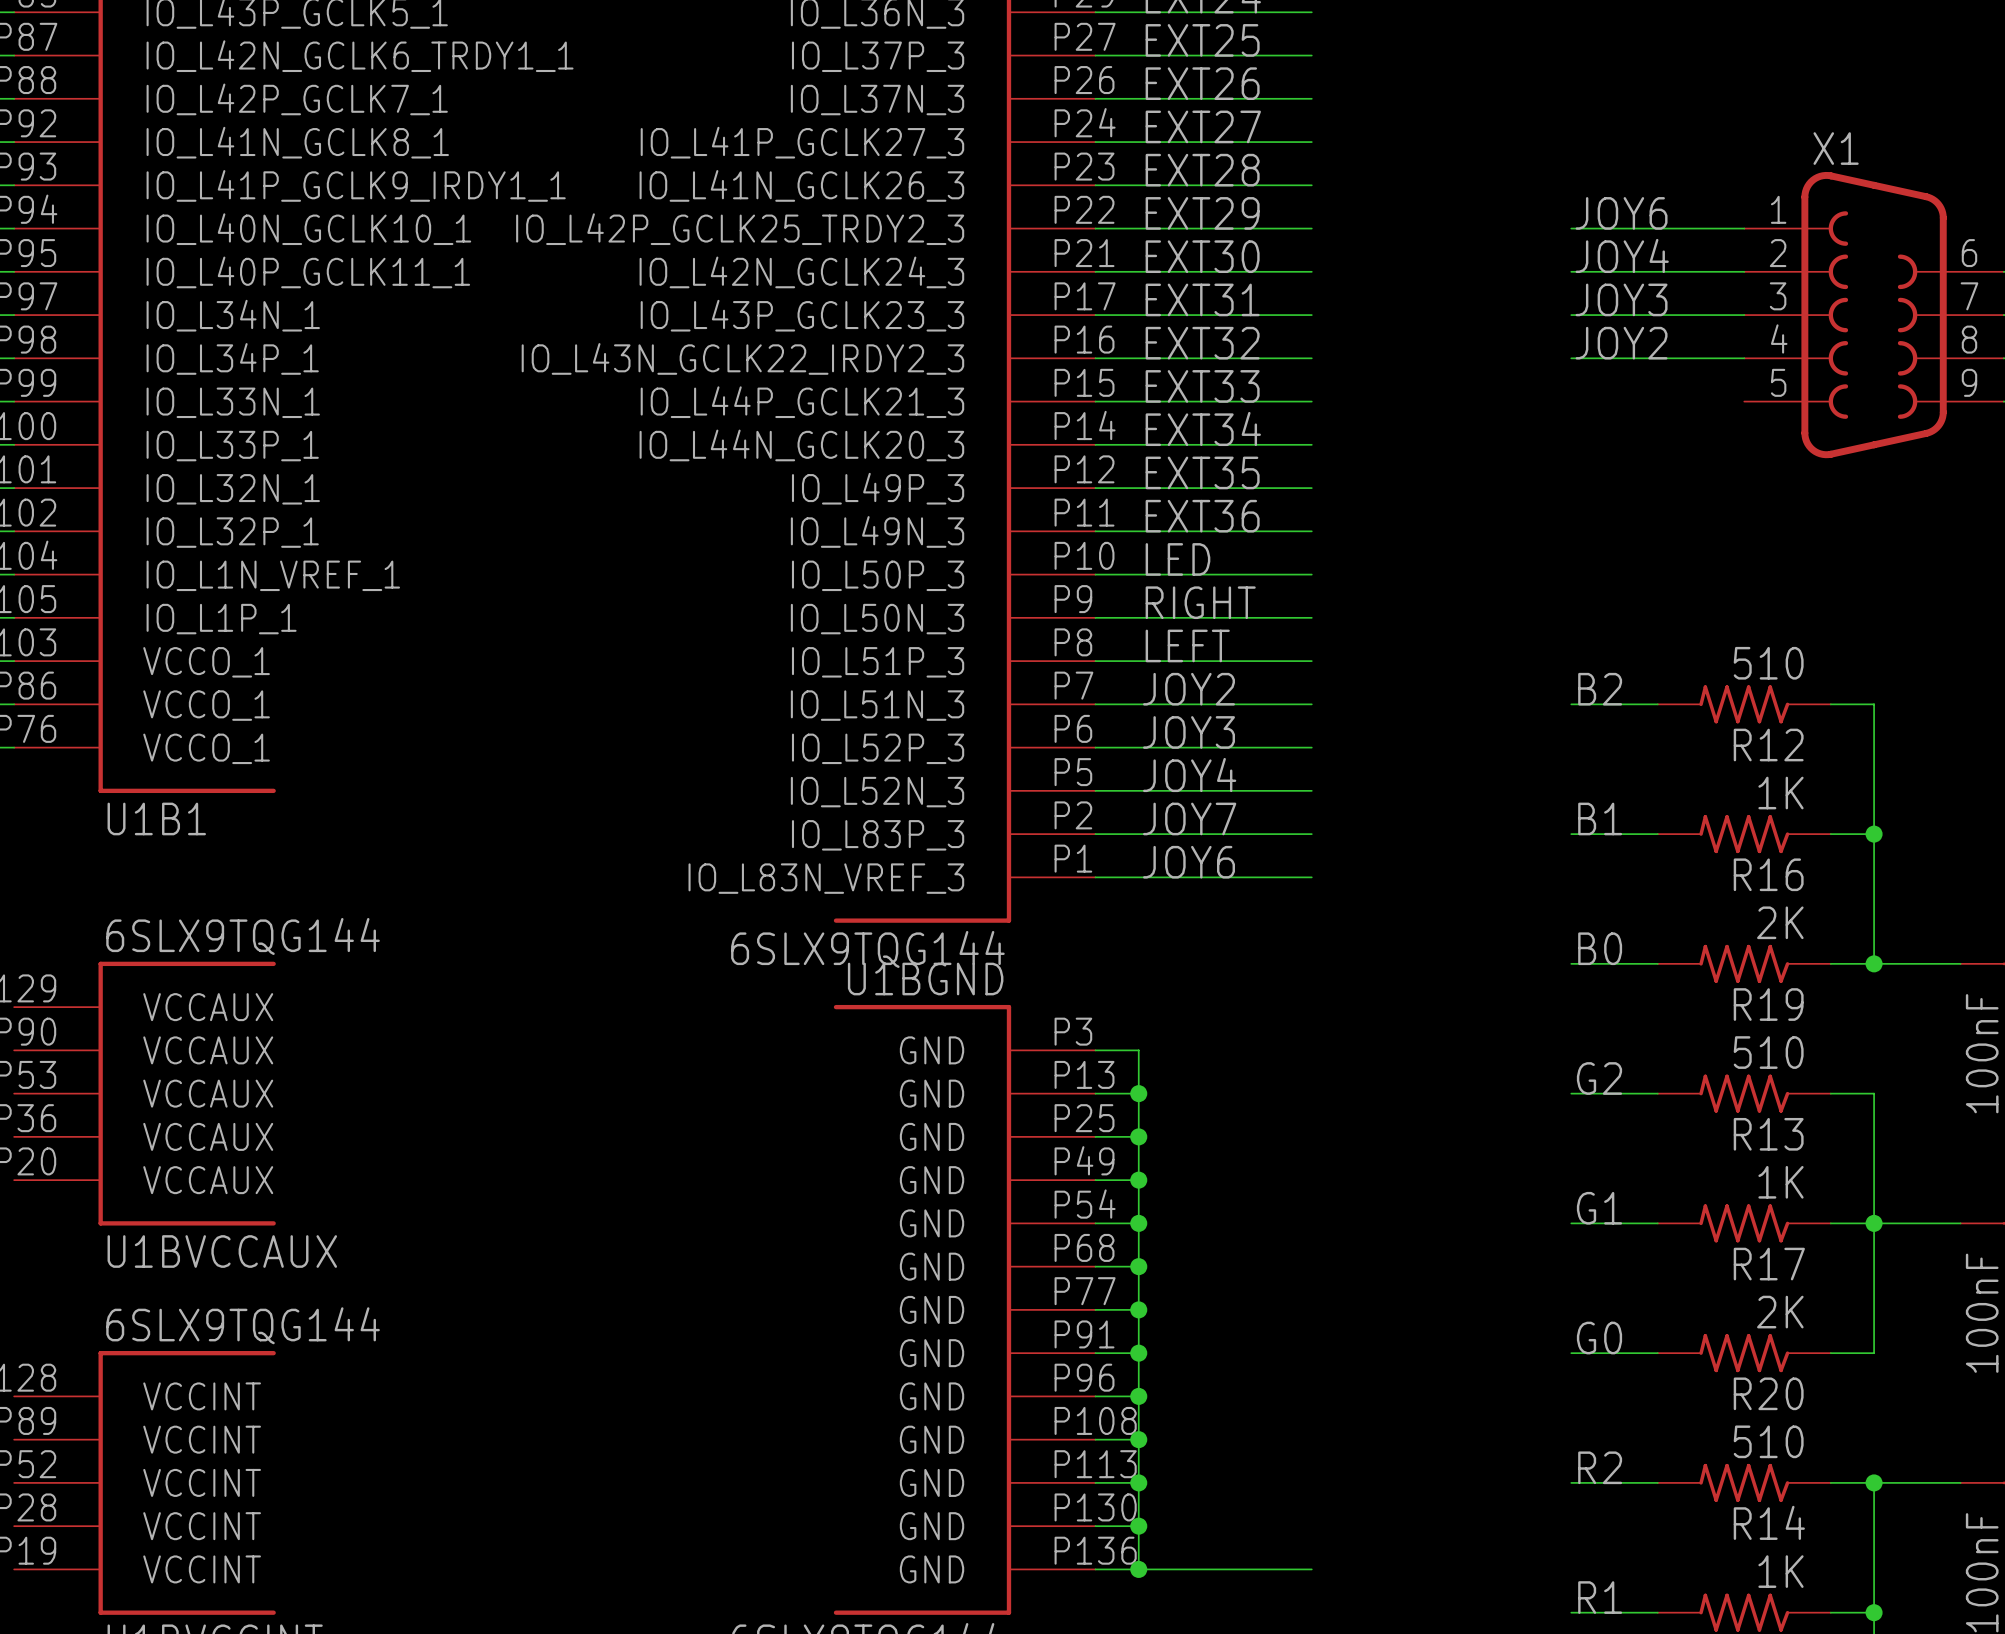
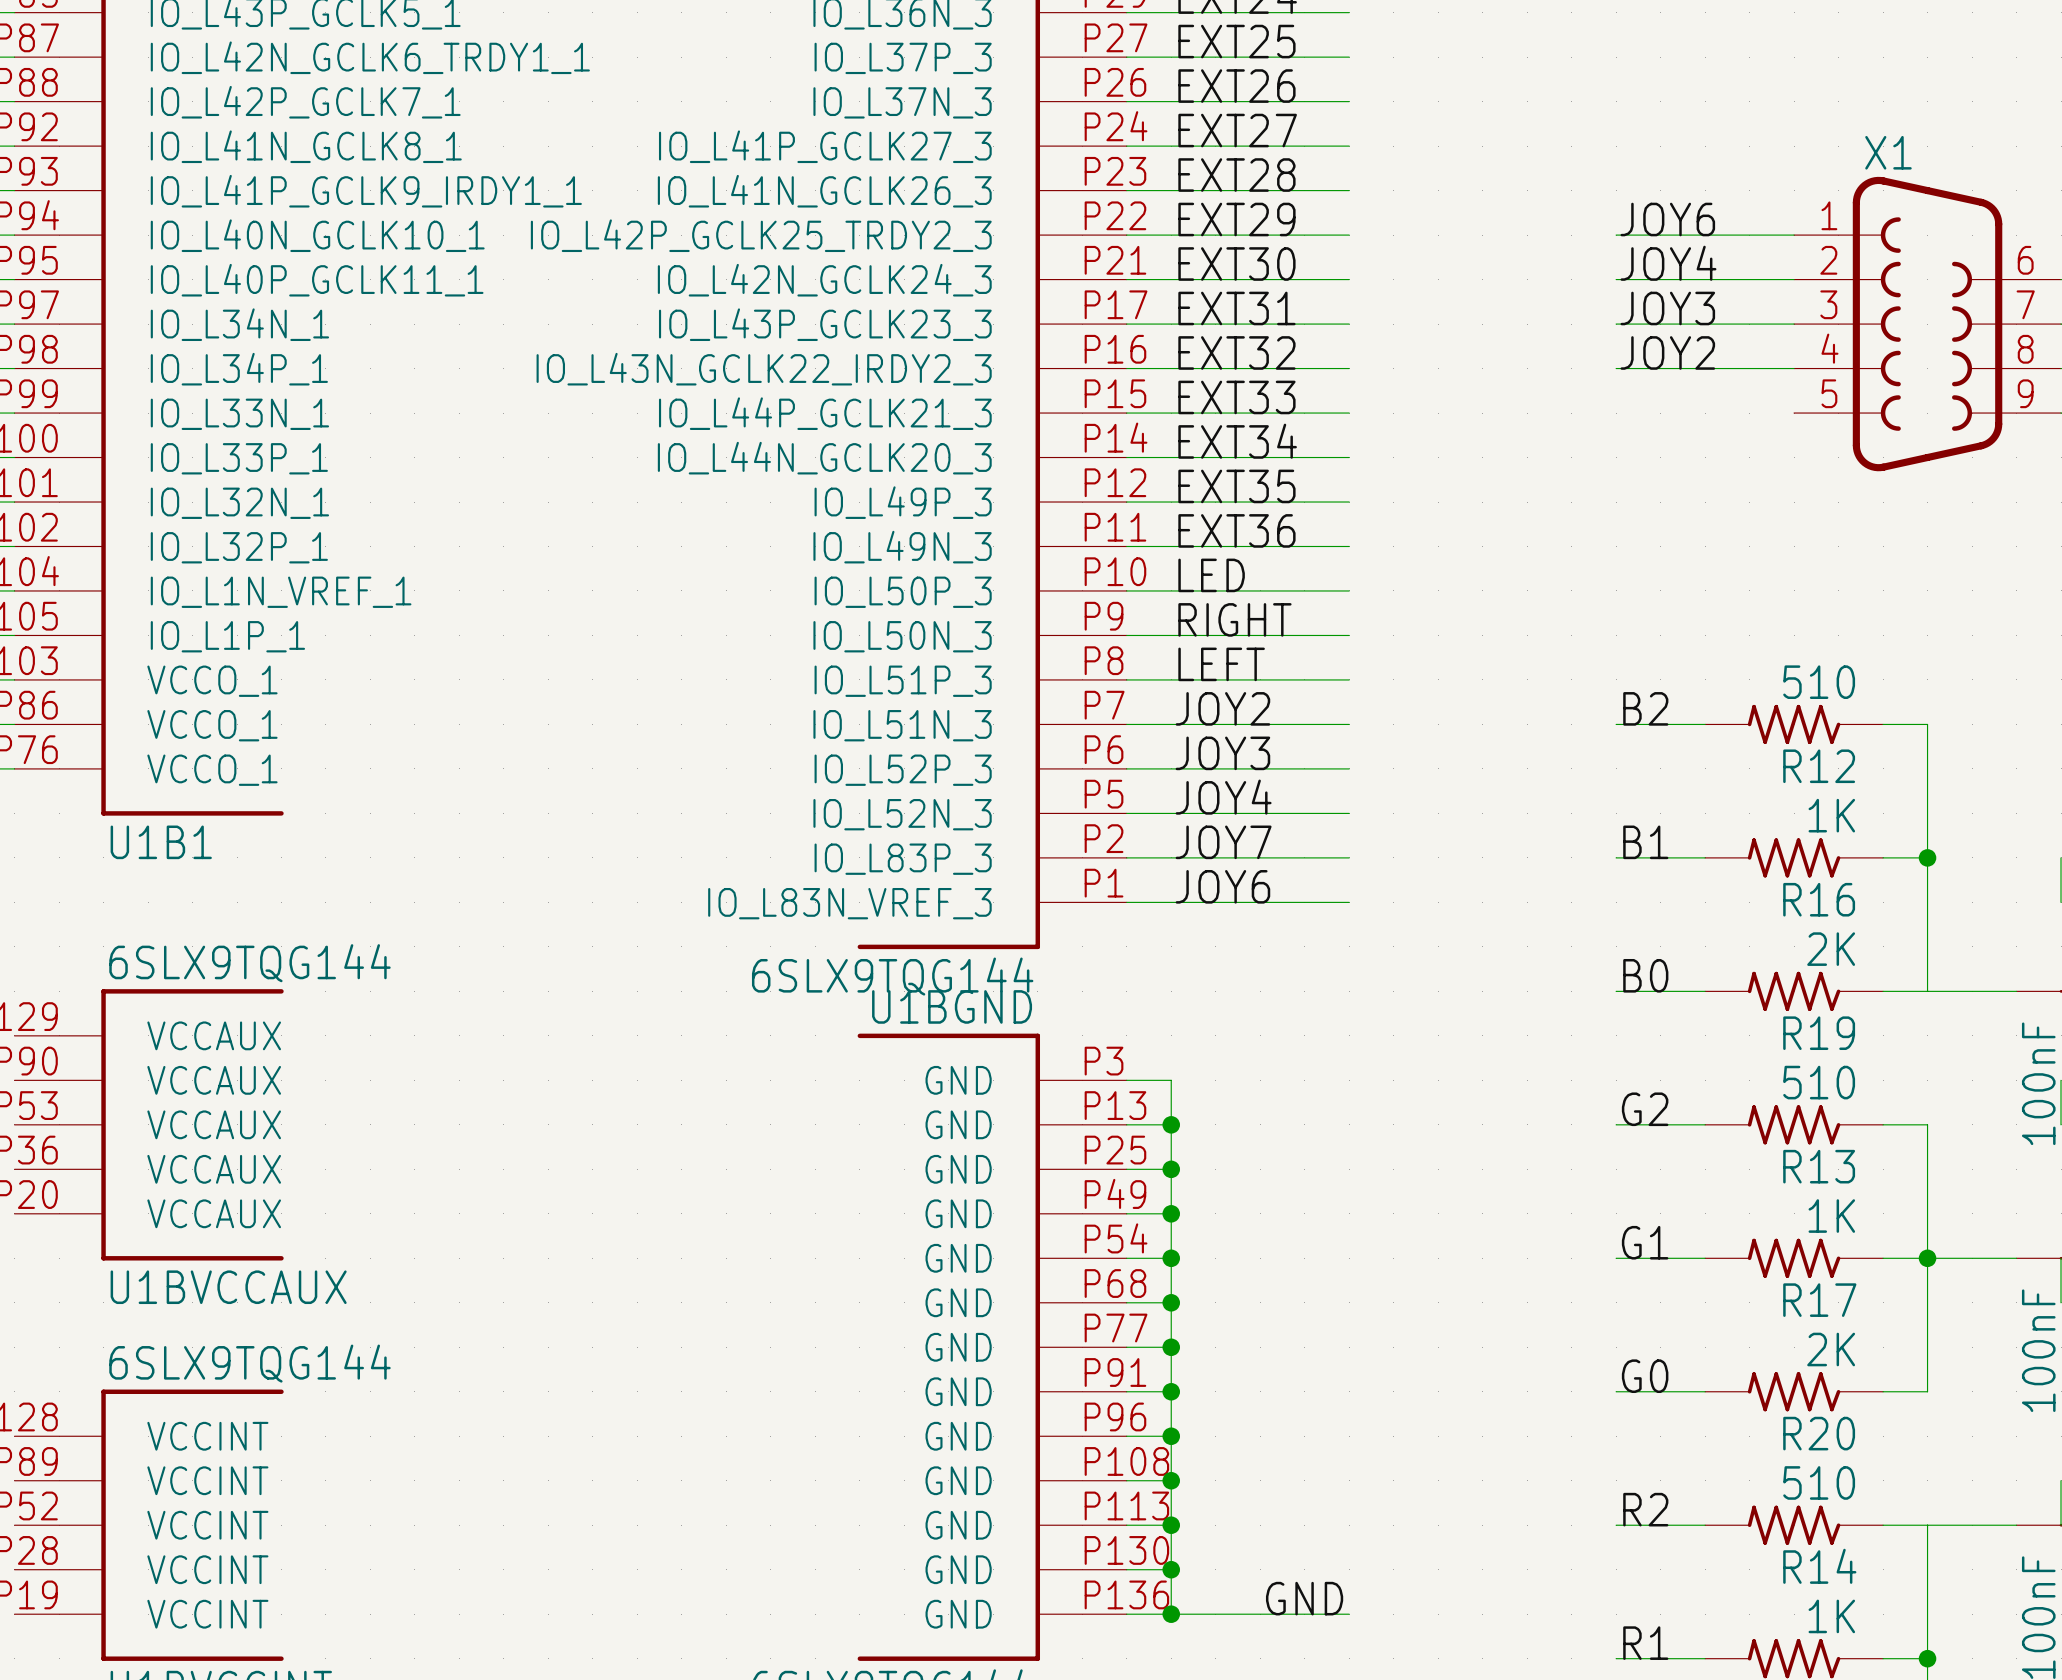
wire: none -> (2061, 857) (2061, 902)
junction: (1874, 963) -> none
wire: none -> (2061, 1080) (2061, 1124)
wire: none -> (2061, 1258) (2061, 1302)
wire: none -> (2061, 1480) (2061, 1525)
junction: (1874, 1482) -> none
label: none -> GND (1304, 1598)

